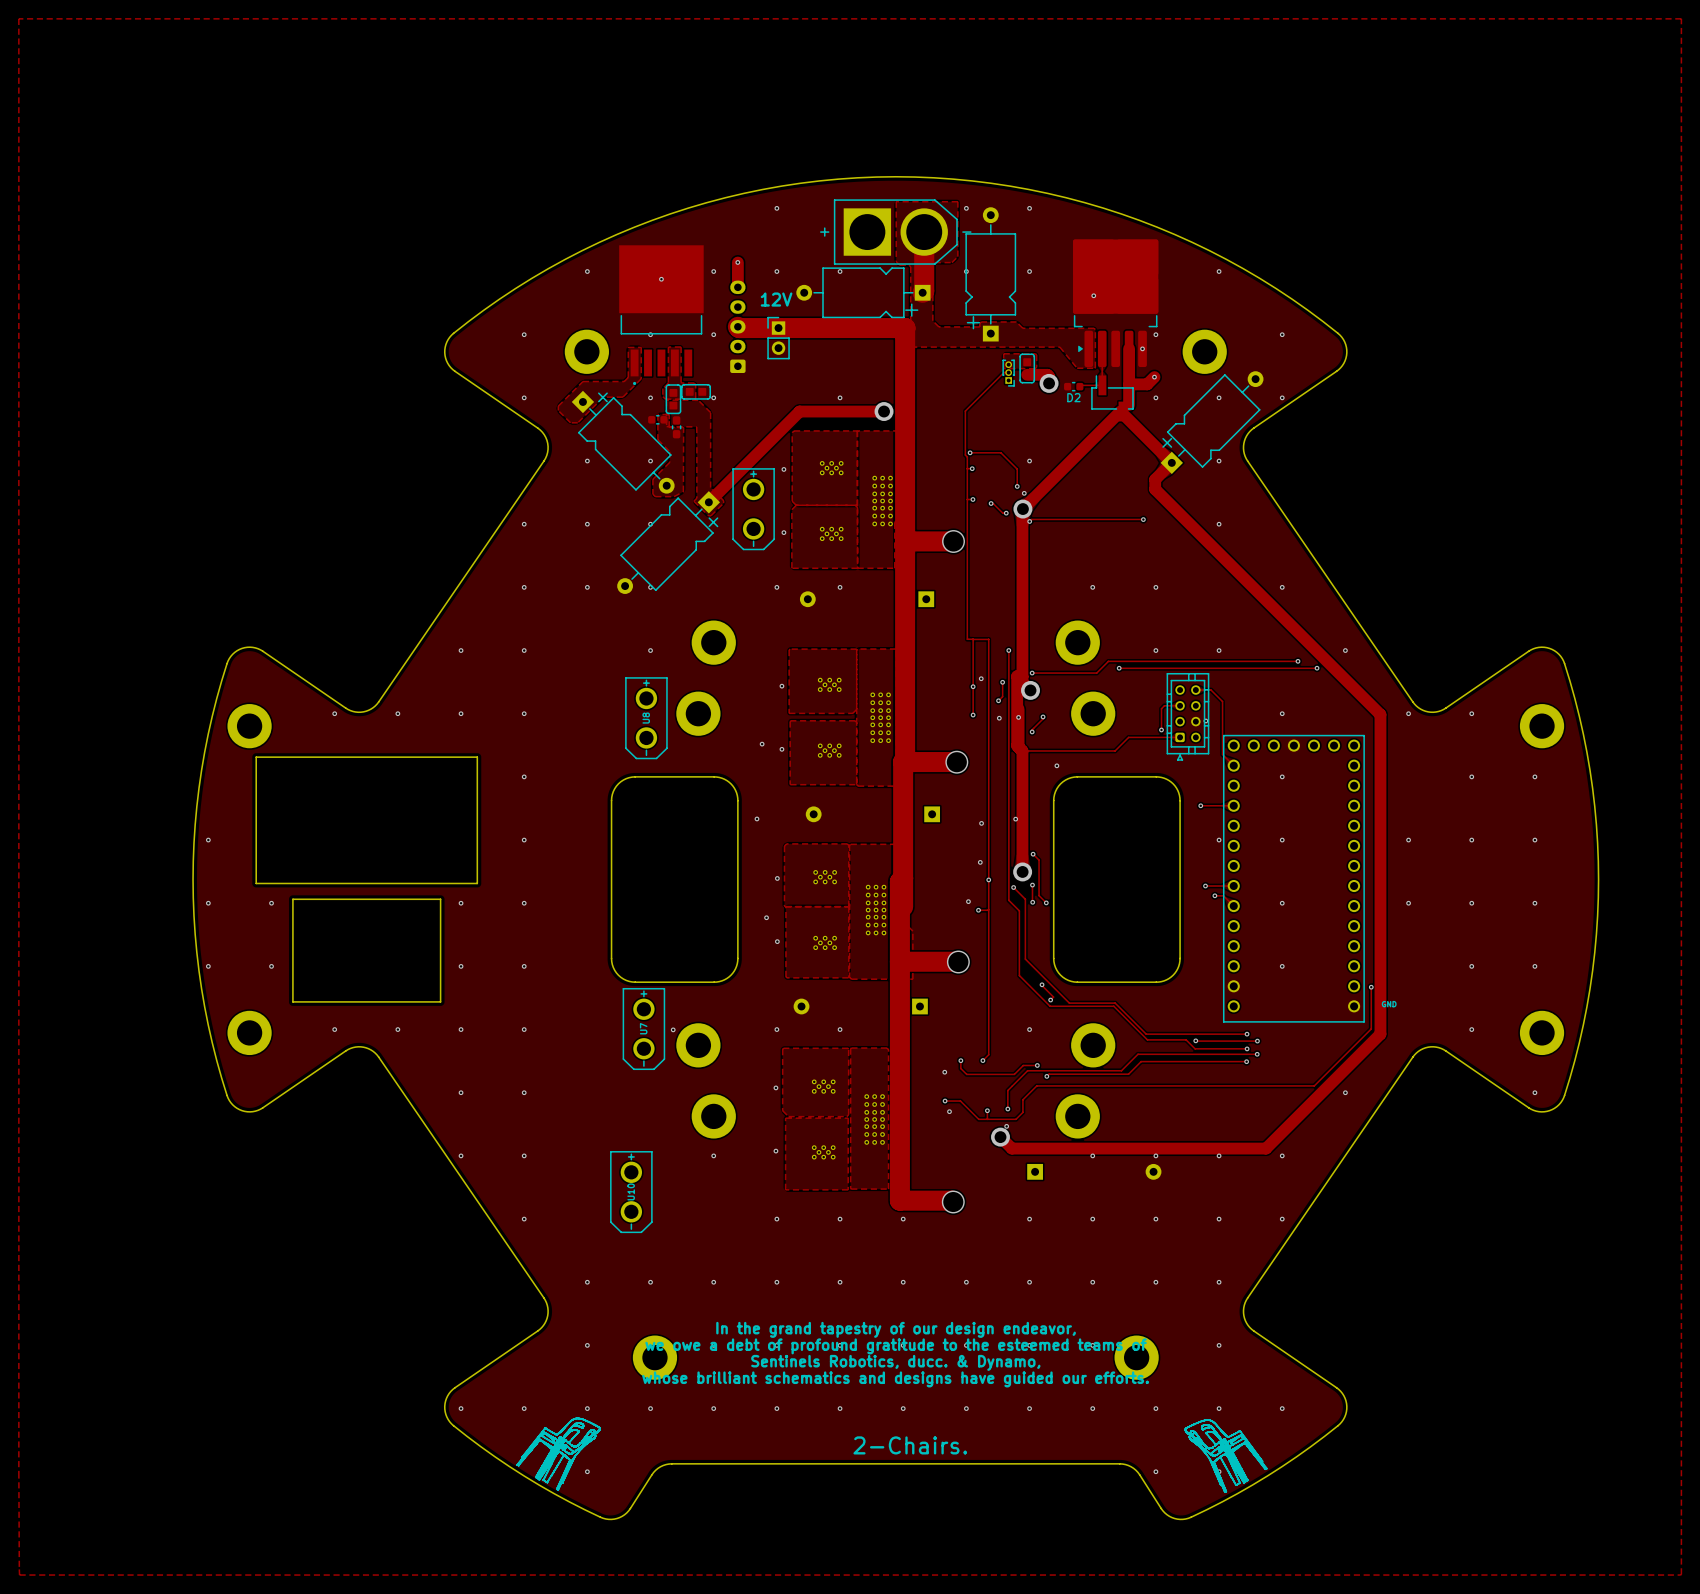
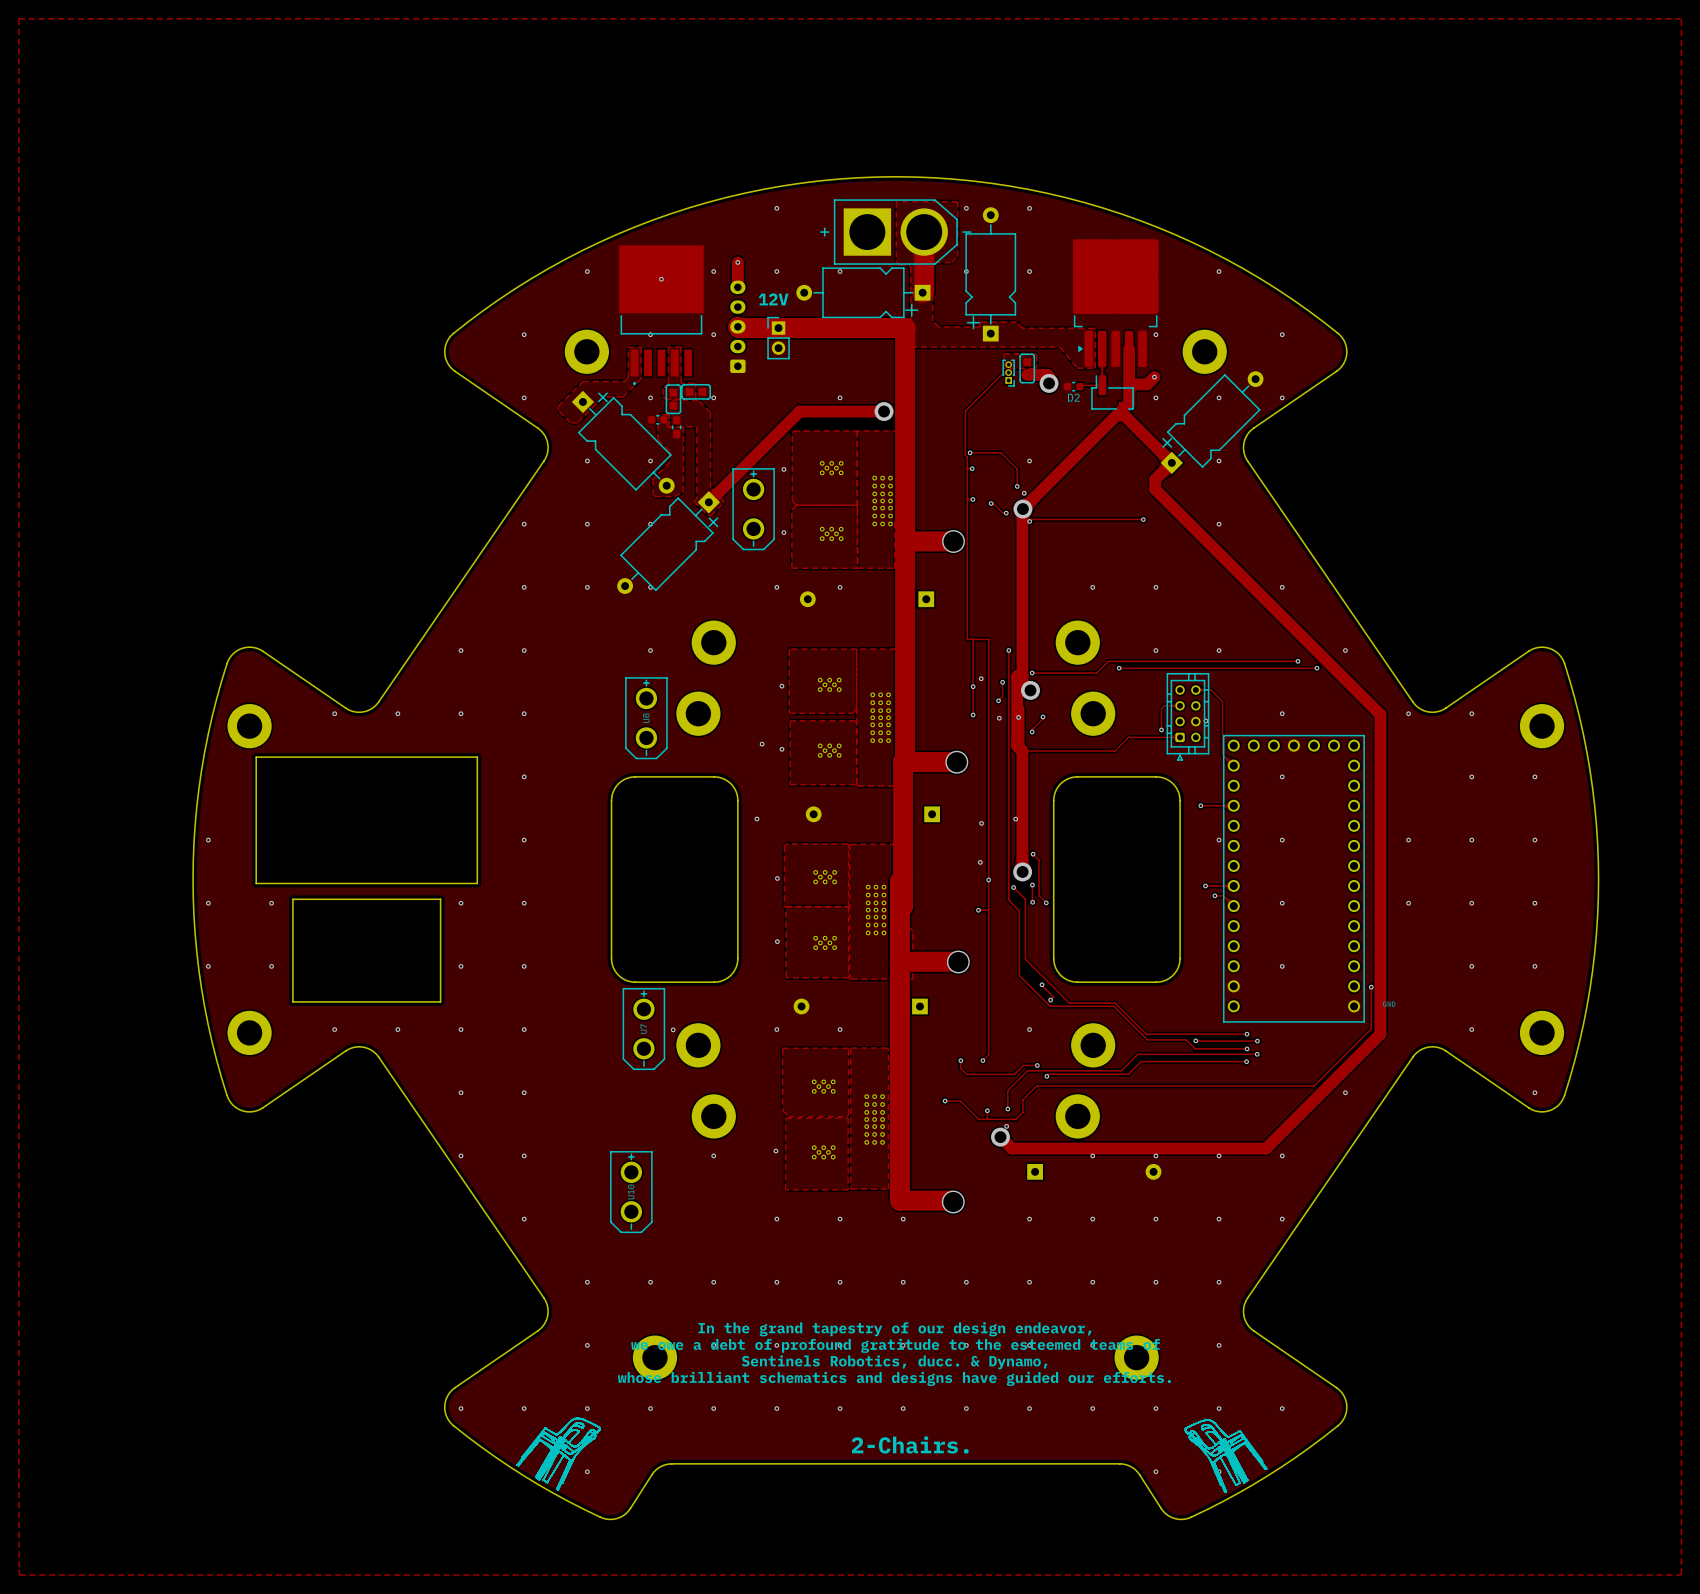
via: (1093, 295) -> none
via: (1142, 348) -> none
via: (1056, 765) -> none
via: (968, 901) -> none
via: (766, 917) -> none
via: (944, 1072) -> none
via: (775, 1087) -> none
via: (949, 1111) -> none

